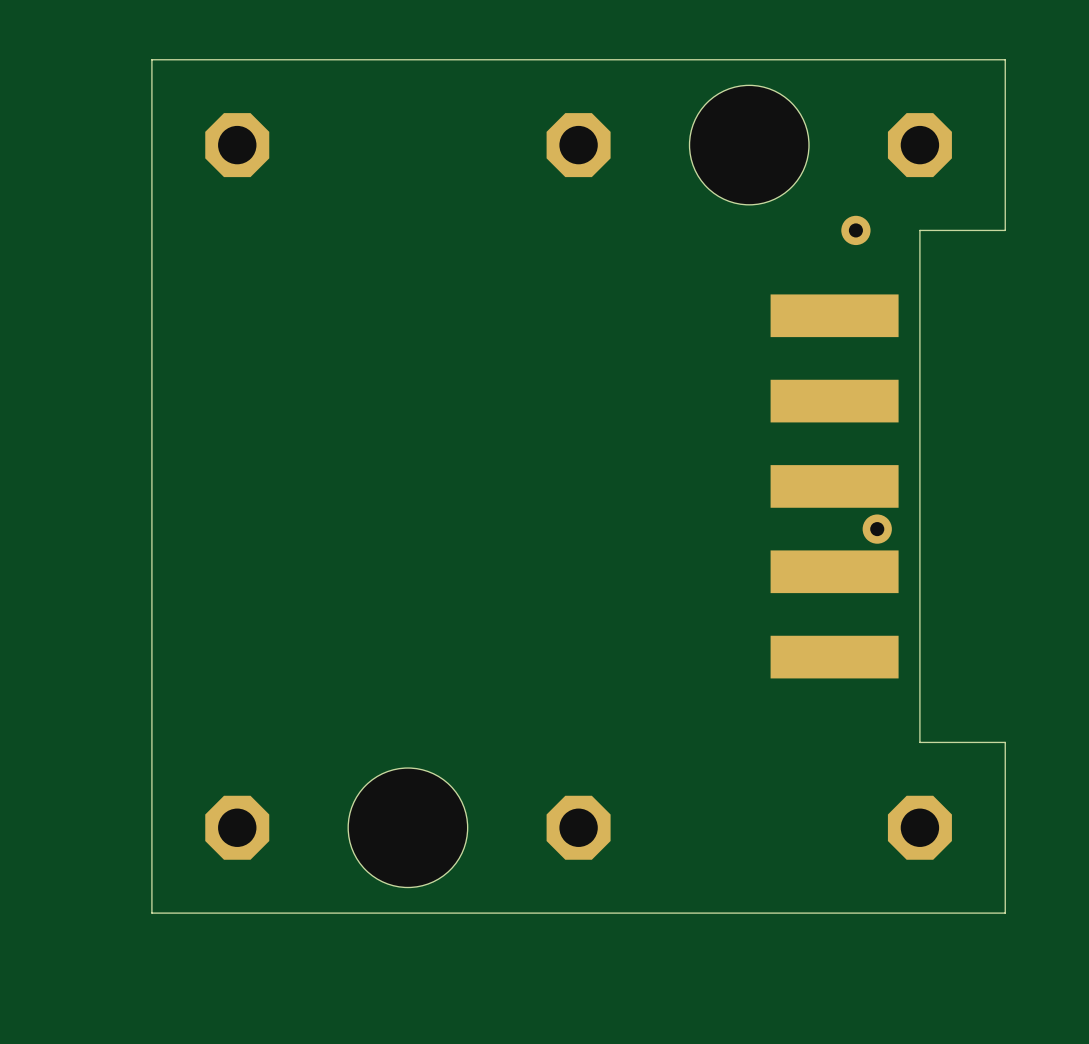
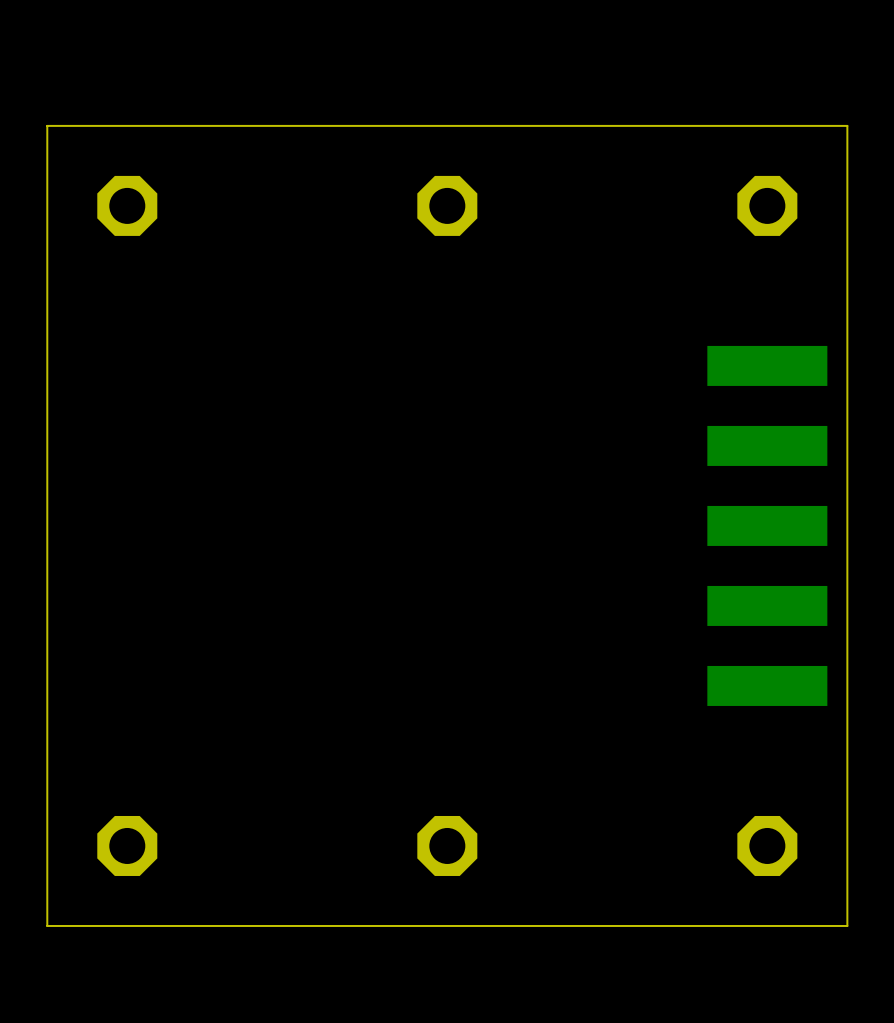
hole: (749, 145) -> none
part: (855, 230) -> none
board edge: (1005, 230) (919, 230) (919, 742) (1005, 742) -> (847, 285) (847, 765)
part position: (834, 486) -> (767, 525)
part: (877, 529) -> none
hole: (407, 827) -> none

